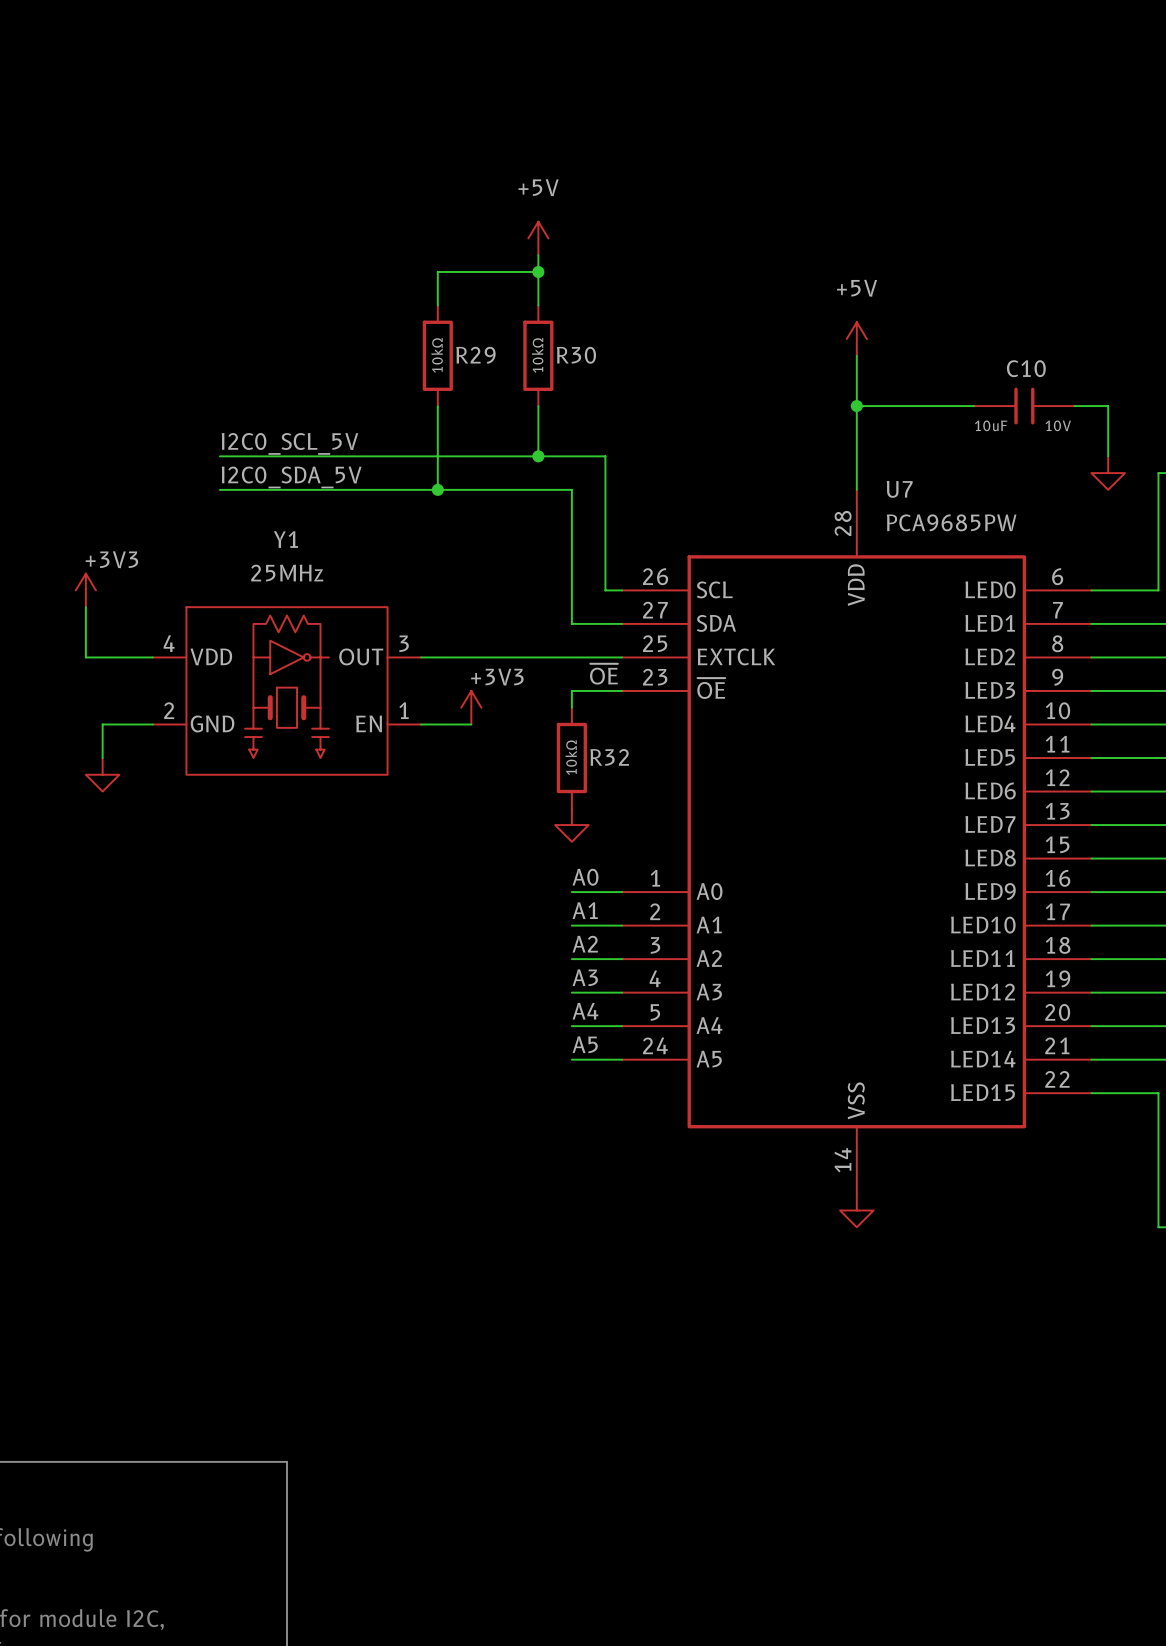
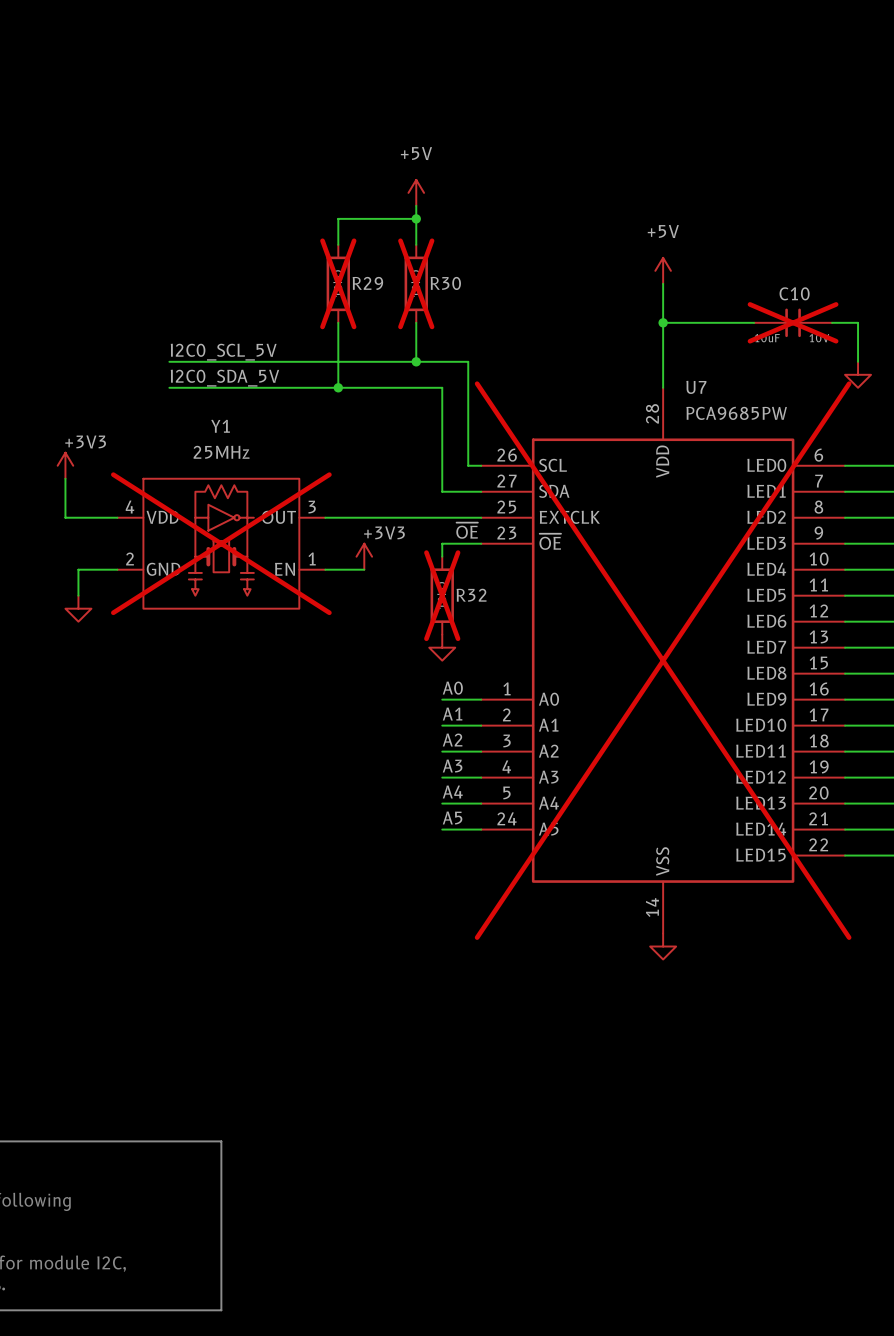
R29 do-not-place cross: none -> (338, 283)
R30 do-not-place cross: none -> (416, 283)
C10 do-not-place cross: none -> (793, 322)
Y1 do-not-place cross: none -> (221, 543)
R32 do-not-place cross: none -> (442, 595)
U7 do-not-place cross: none -> (663, 660)

